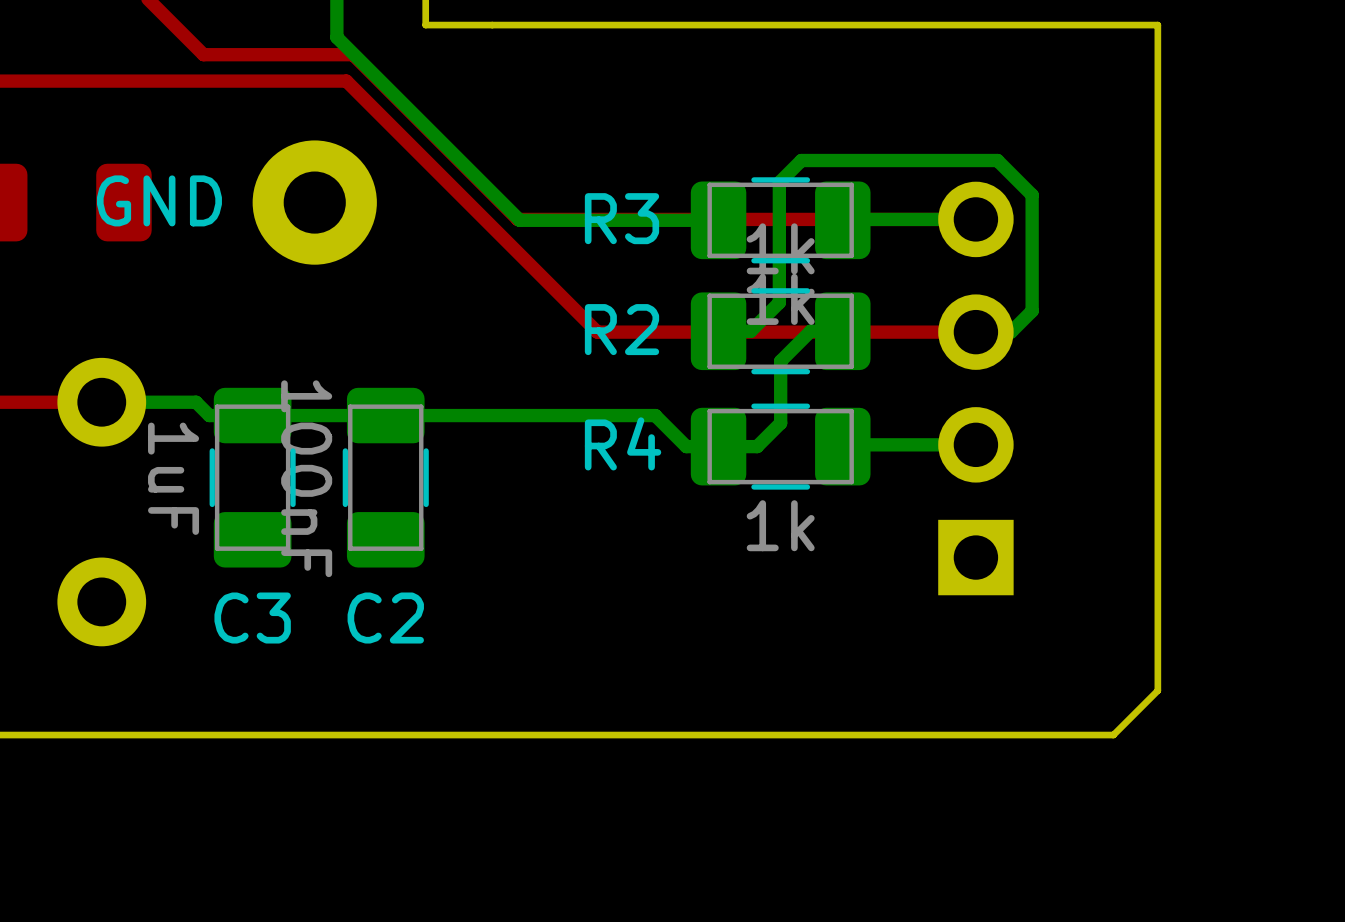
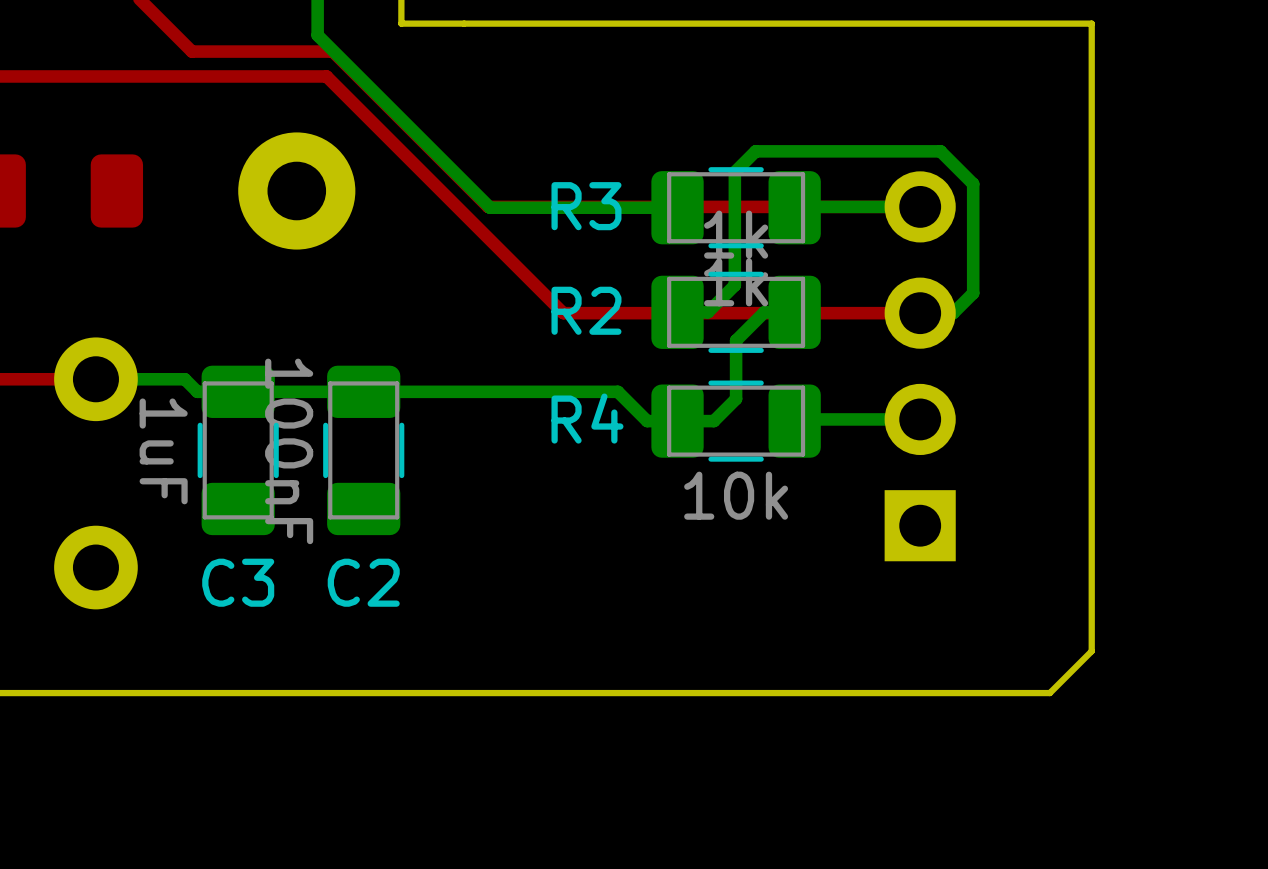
text: GND (159, 200) -> none
R4 value: 1k (780, 525) -> 10k (736, 495)

